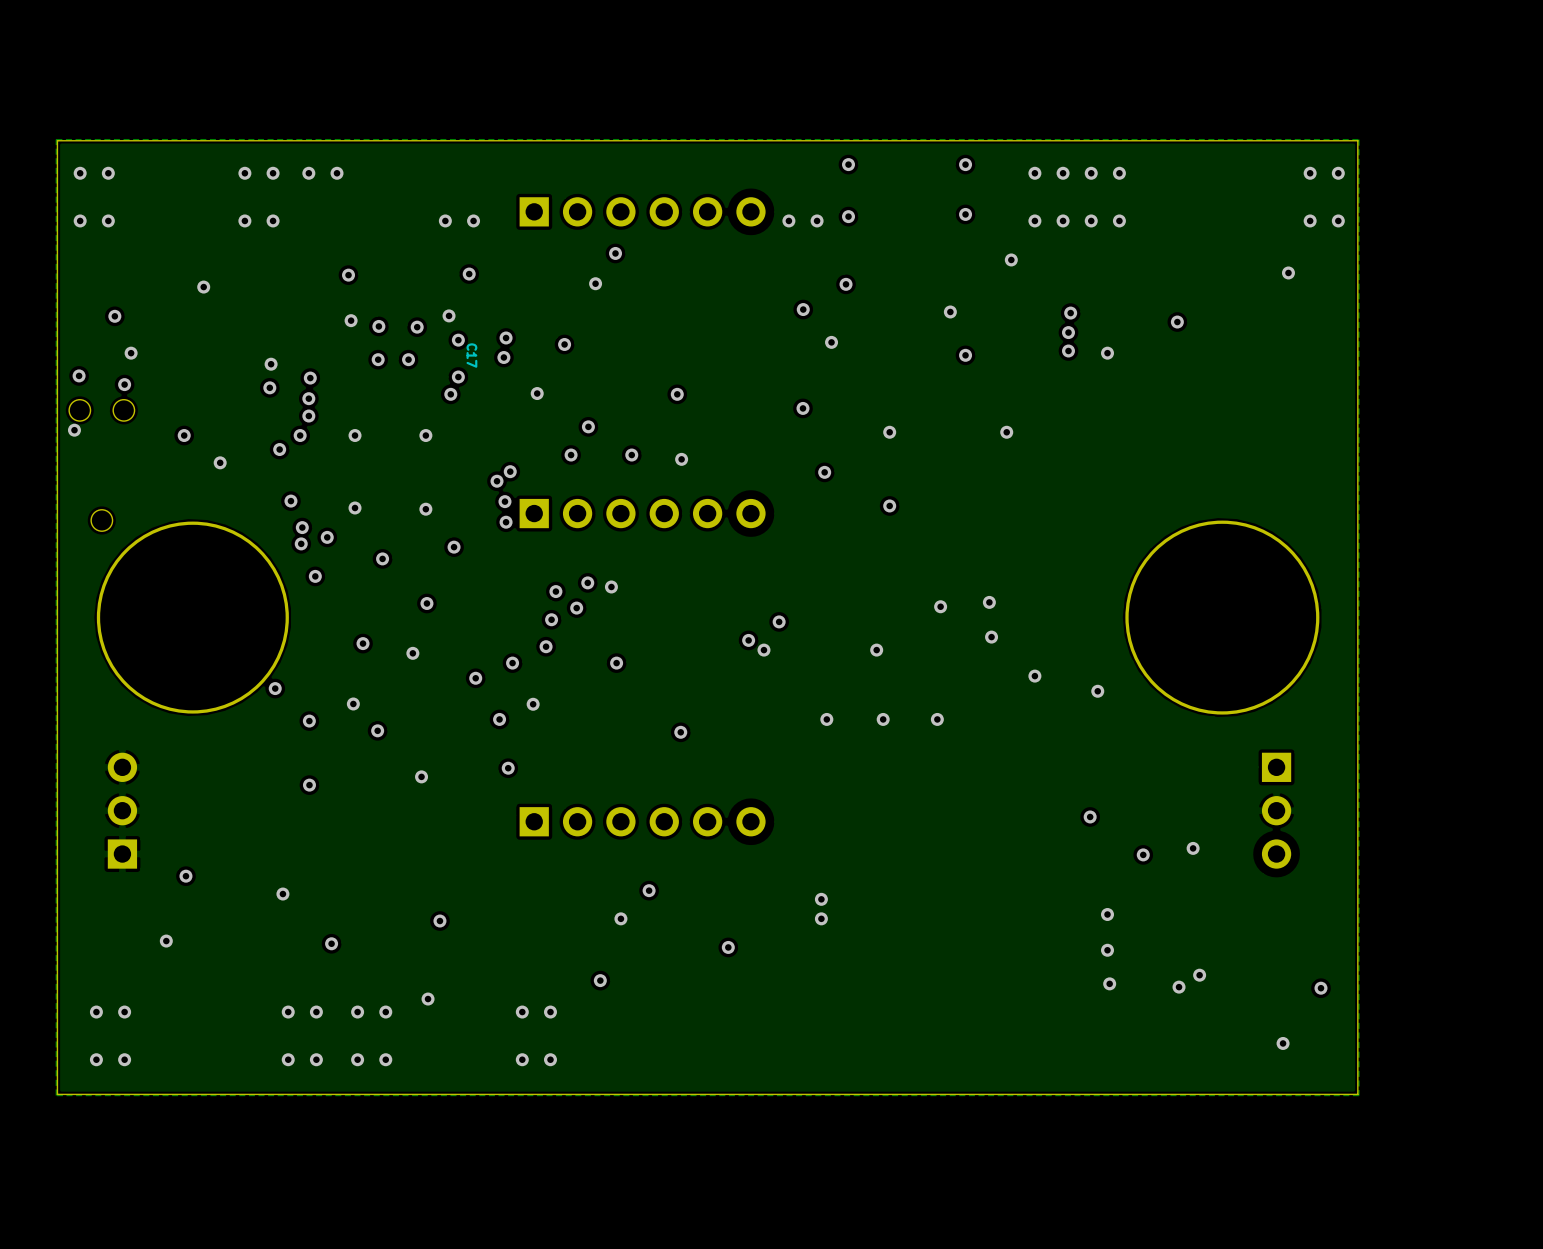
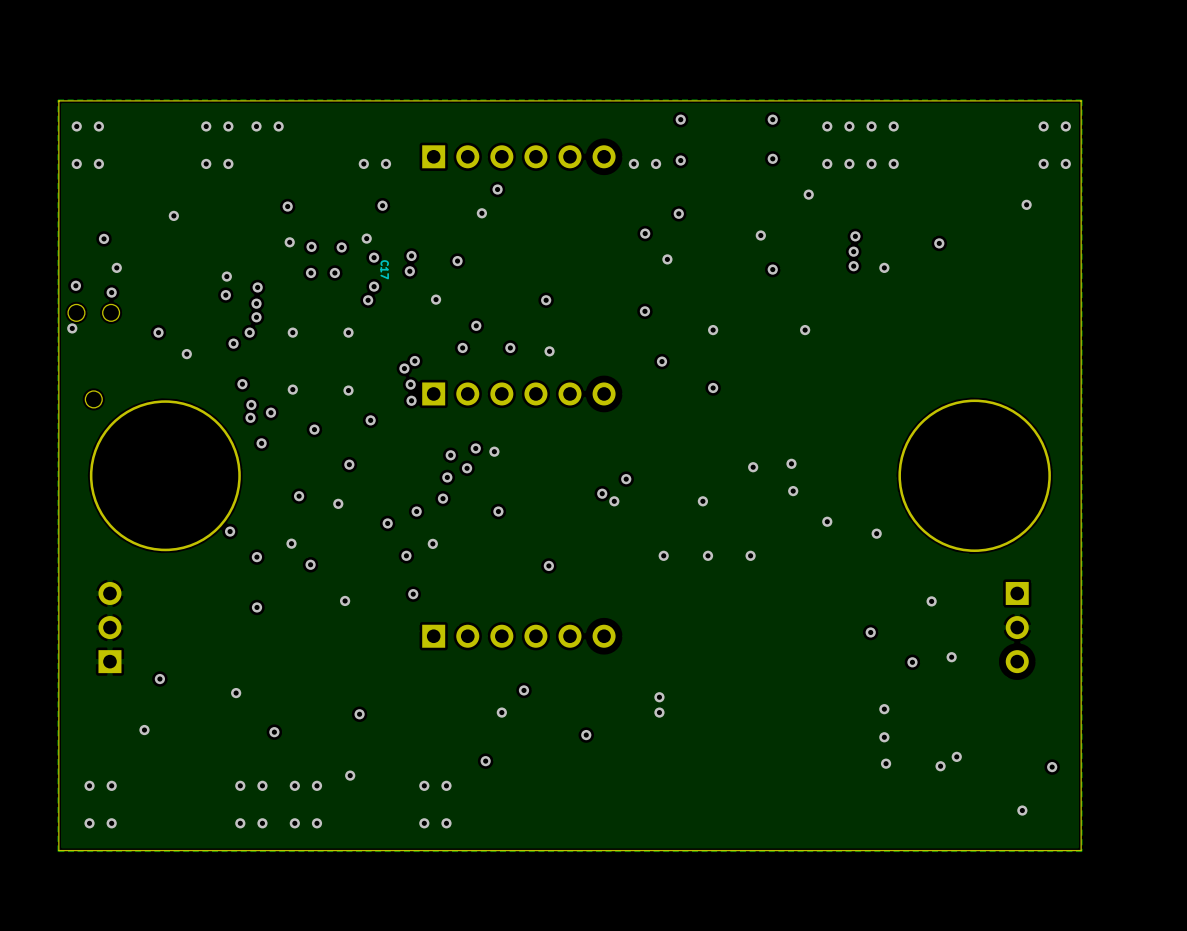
via: none -> (931, 601)

